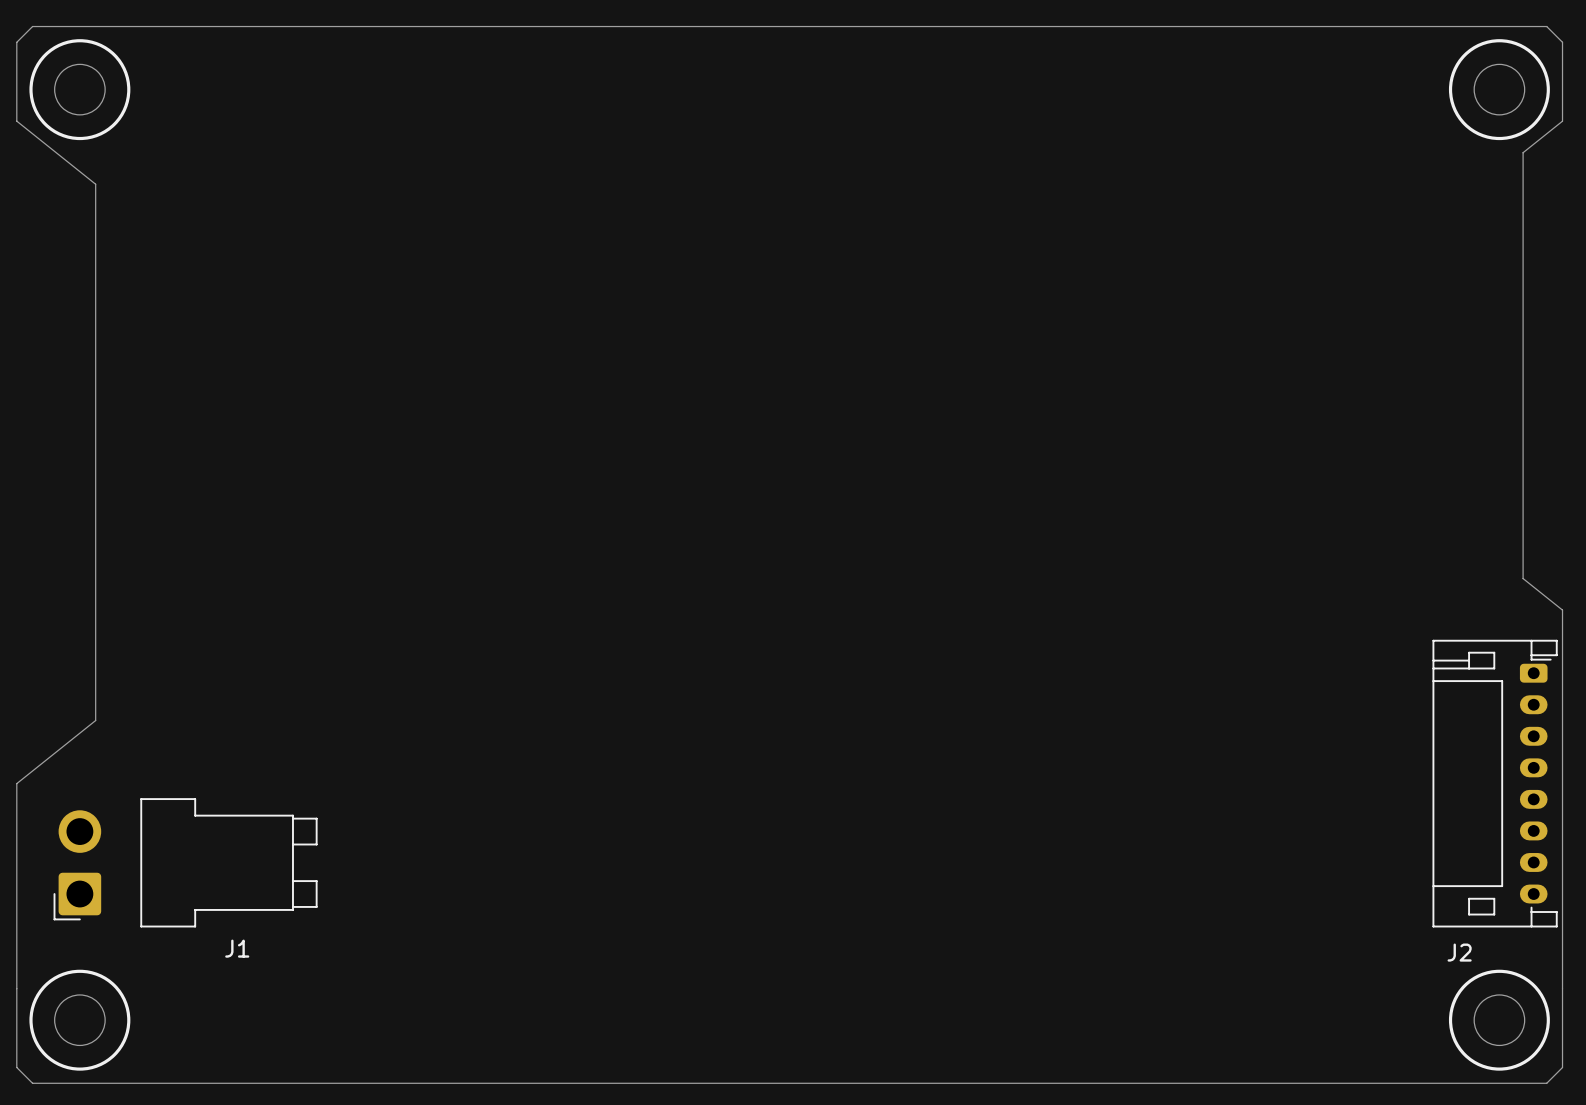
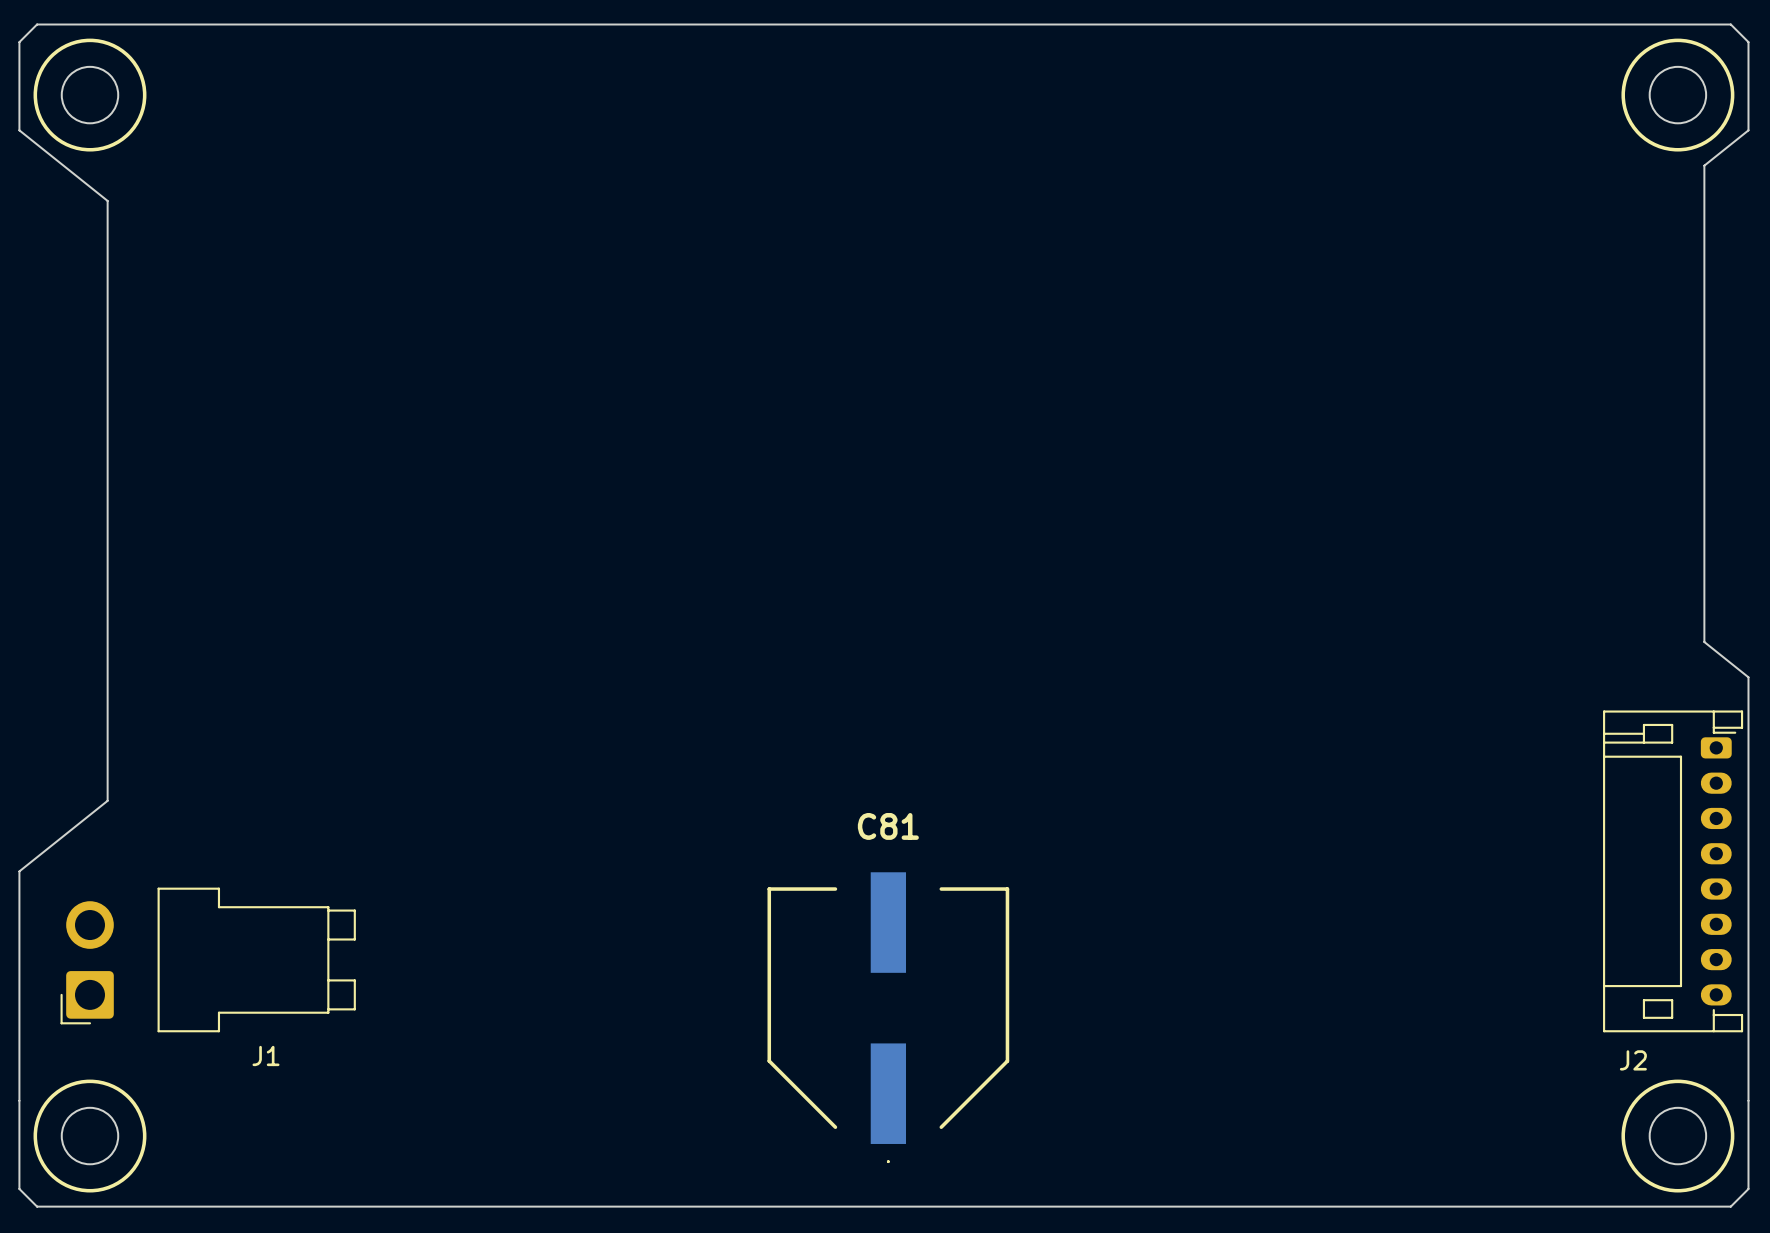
C81: none -> (888, 1017)

